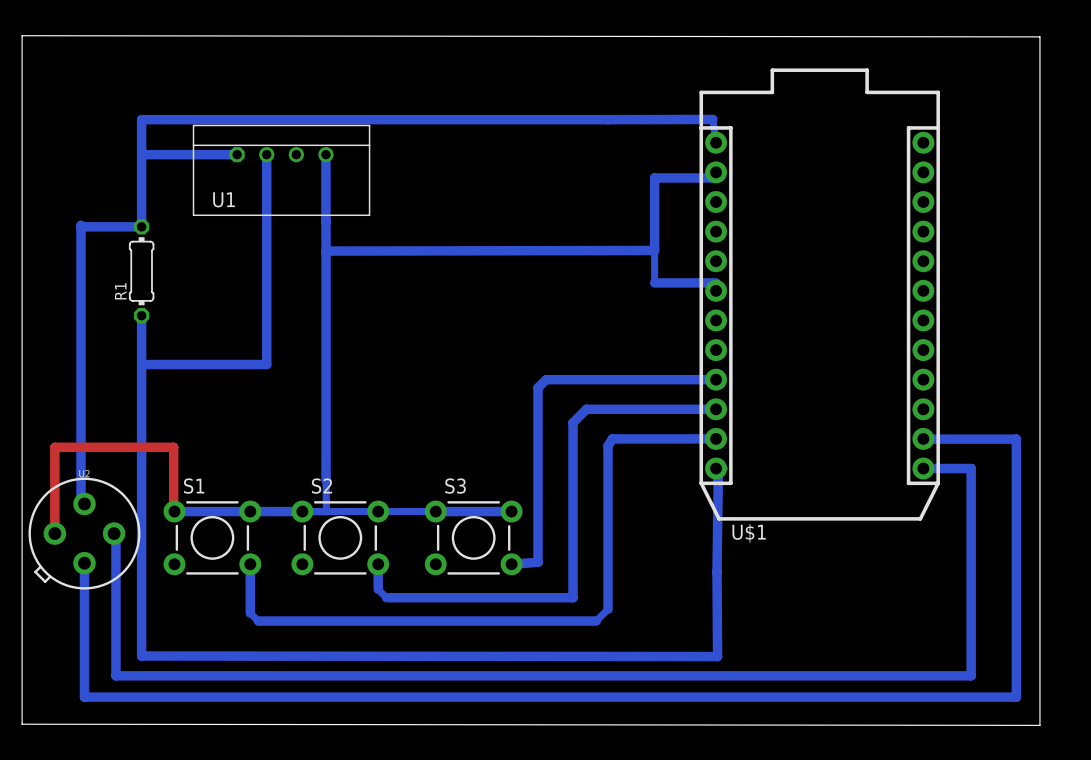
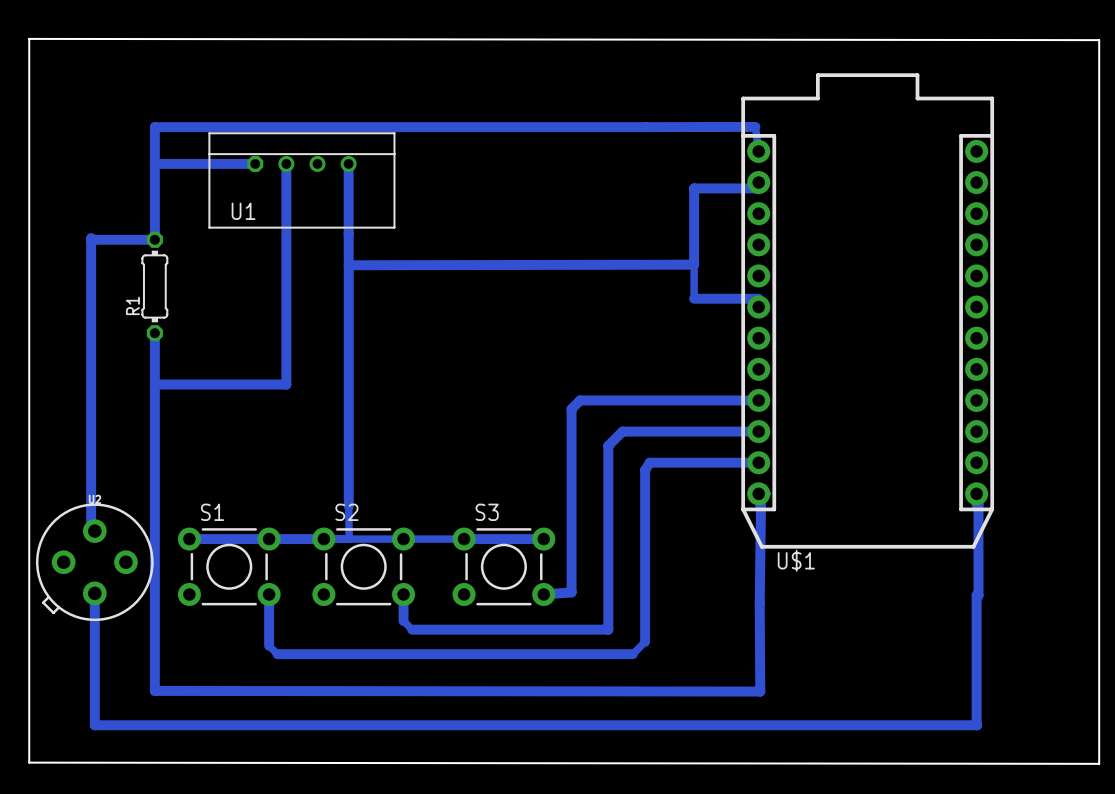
bottom track: (923, 439) (1016, 439) (1016, 697) (84, 697) (84, 688) -> (977, 725) (94, 725)
bottom track: (923, 468) (971, 468) (971, 675) (115, 675) (115, 533) (114, 533) -> (976, 493) (976, 504) (978, 504) (976, 725)
top track: (174, 511) (173, 447) (54, 447) (54, 533) -> none

